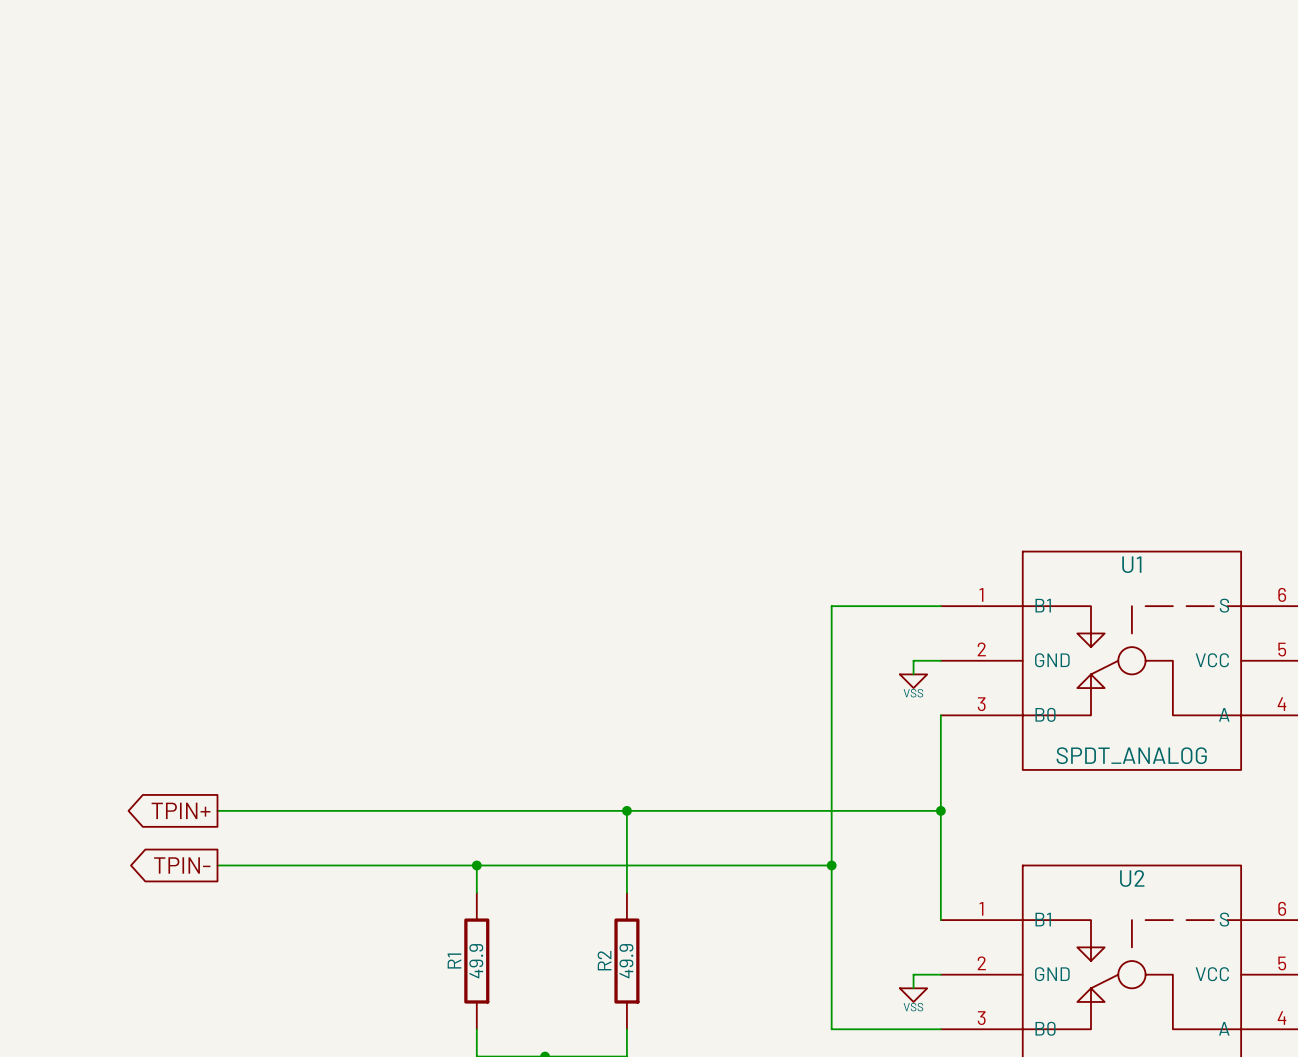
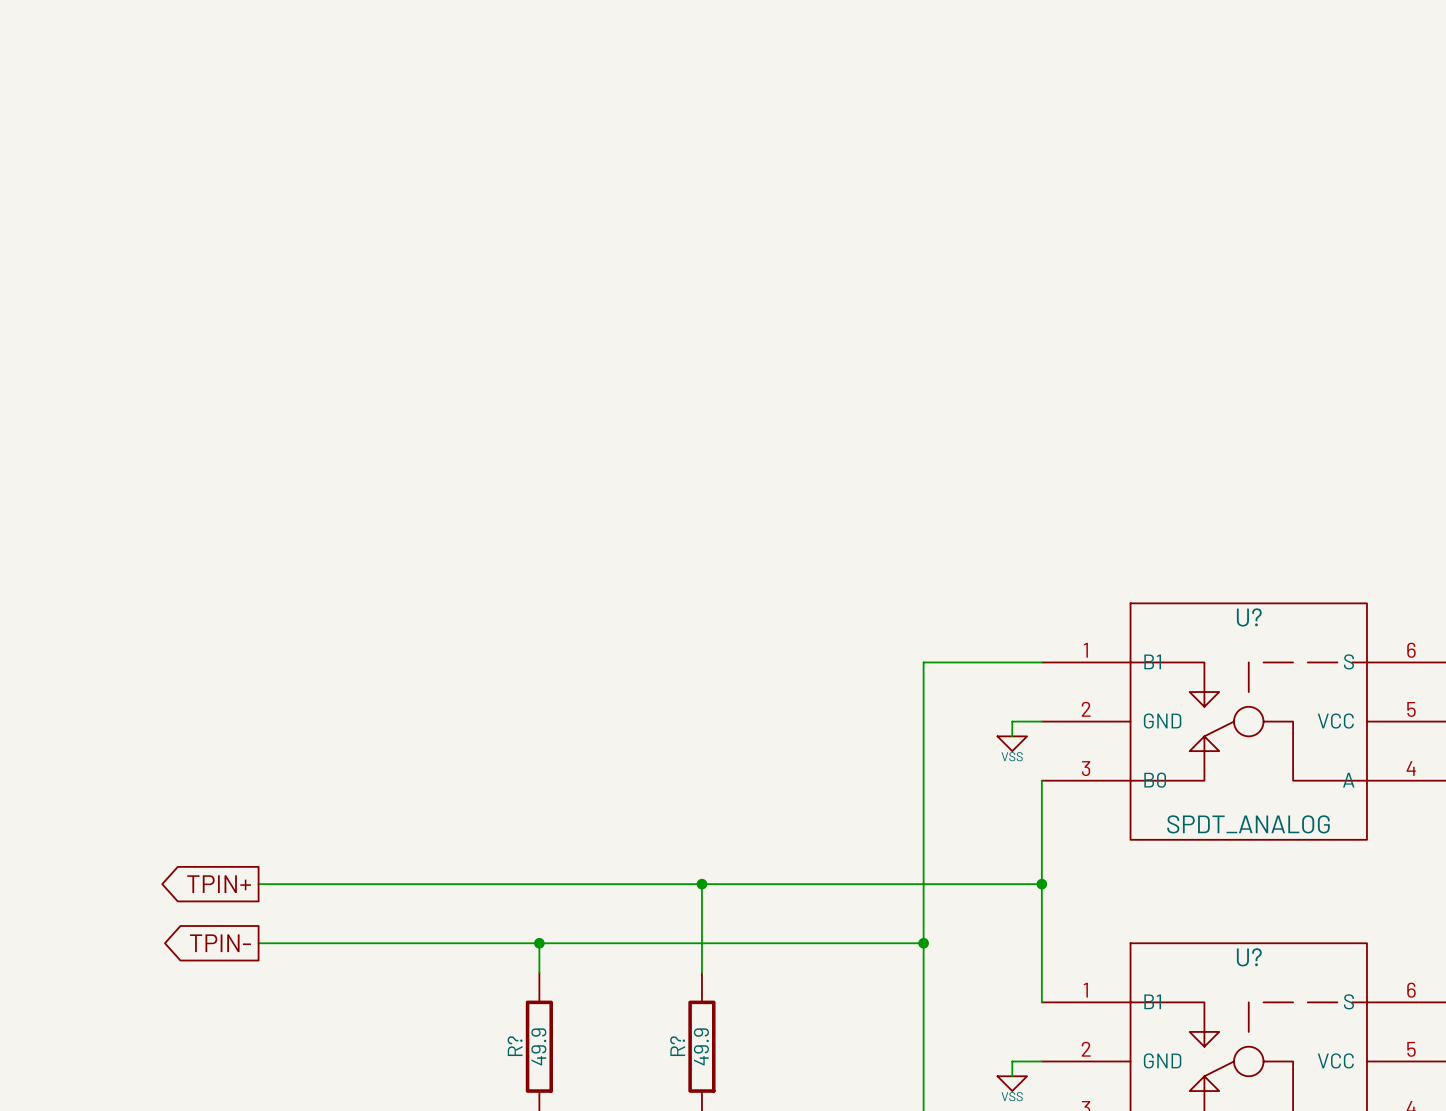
U1 name: U1 (1131, 564) -> U? (1249, 617)
U2 name: U2 (1132, 878) -> U? (1249, 957)
R2 name: R2 (604, 960) -> R? (677, 1046)
R1 name: R1 (454, 961) -> R? (515, 1046)

